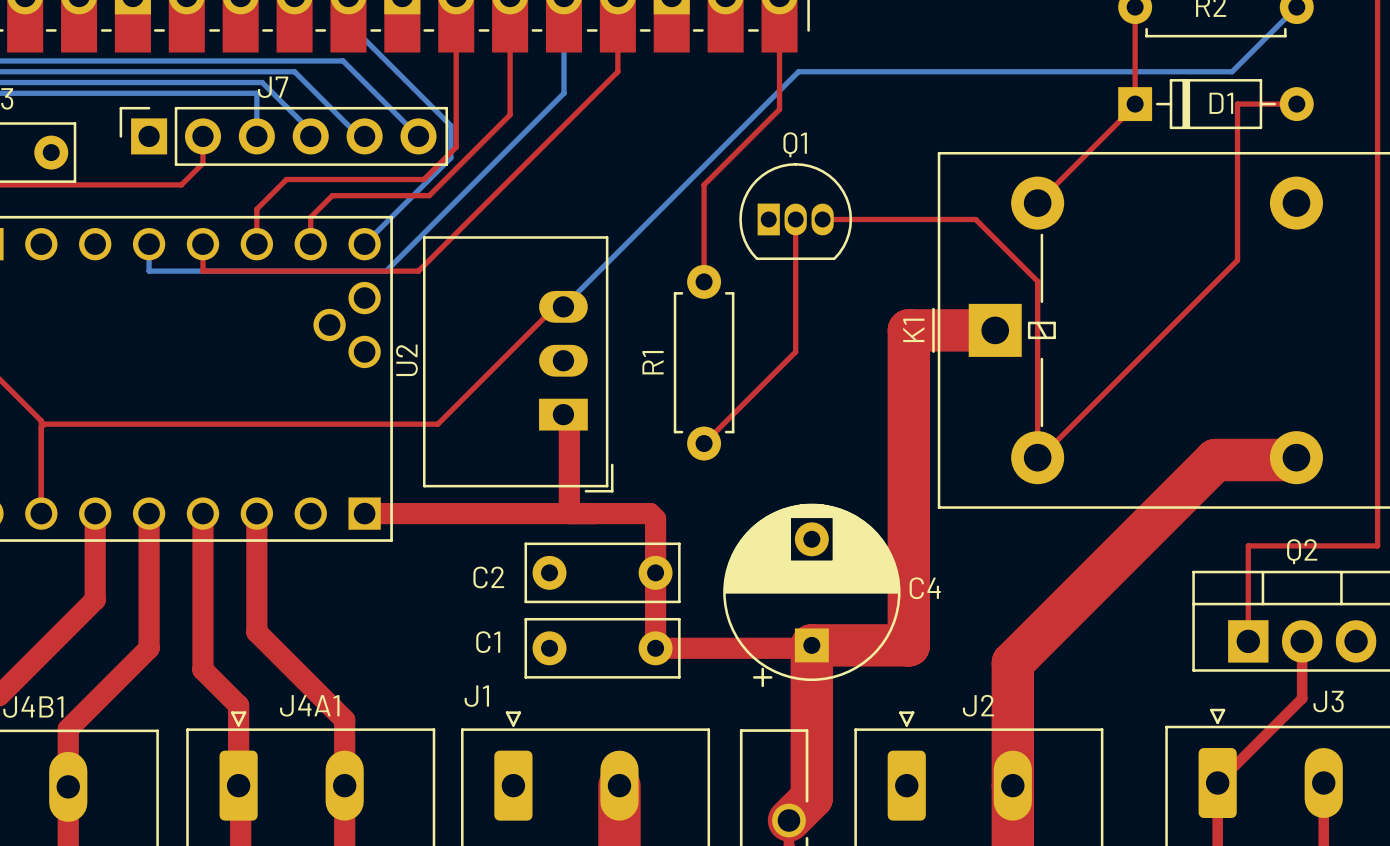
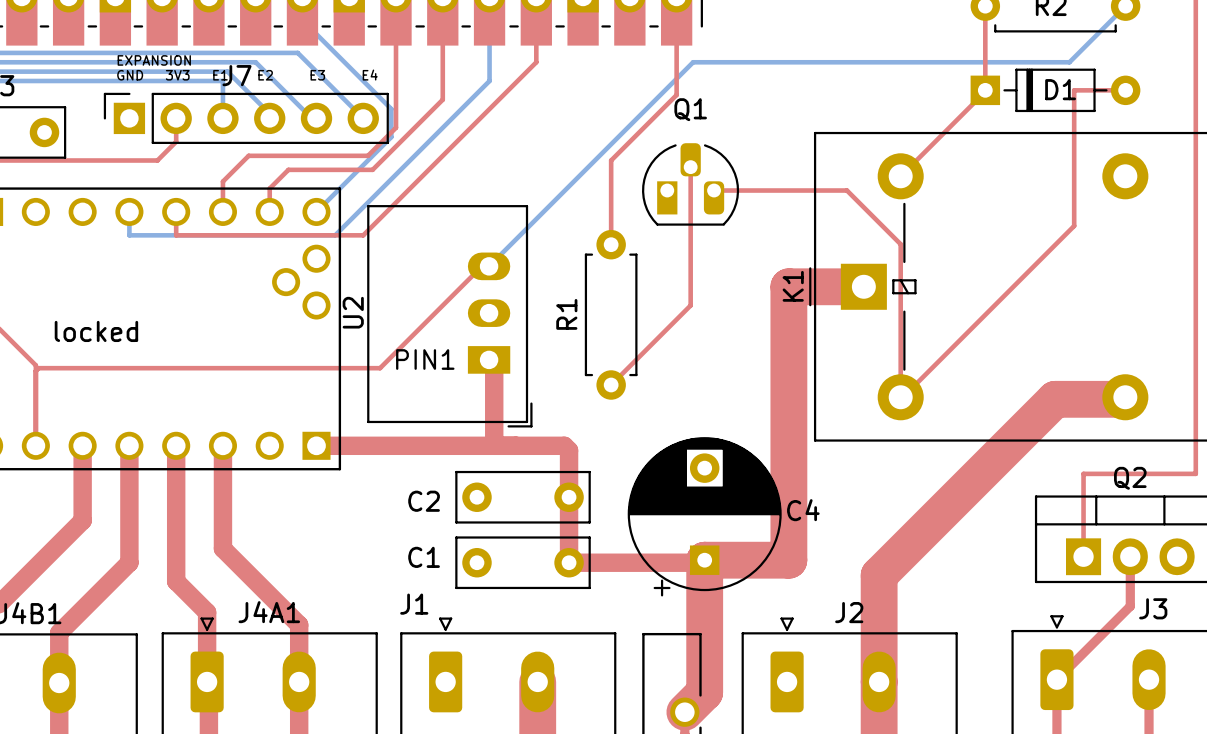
text: none -> EXPANSION (154, 60)
text: none -> GND 3V3 E1 E2 E3 E4 (247, 75)
Q1 footprint: [739, 163, 853, 261] -> [642, 143, 740, 226]
top track: none -> (690, 167) (690, 190)
text: none -> locked (96, 331)
text: none -> PIN1 (425, 359)

